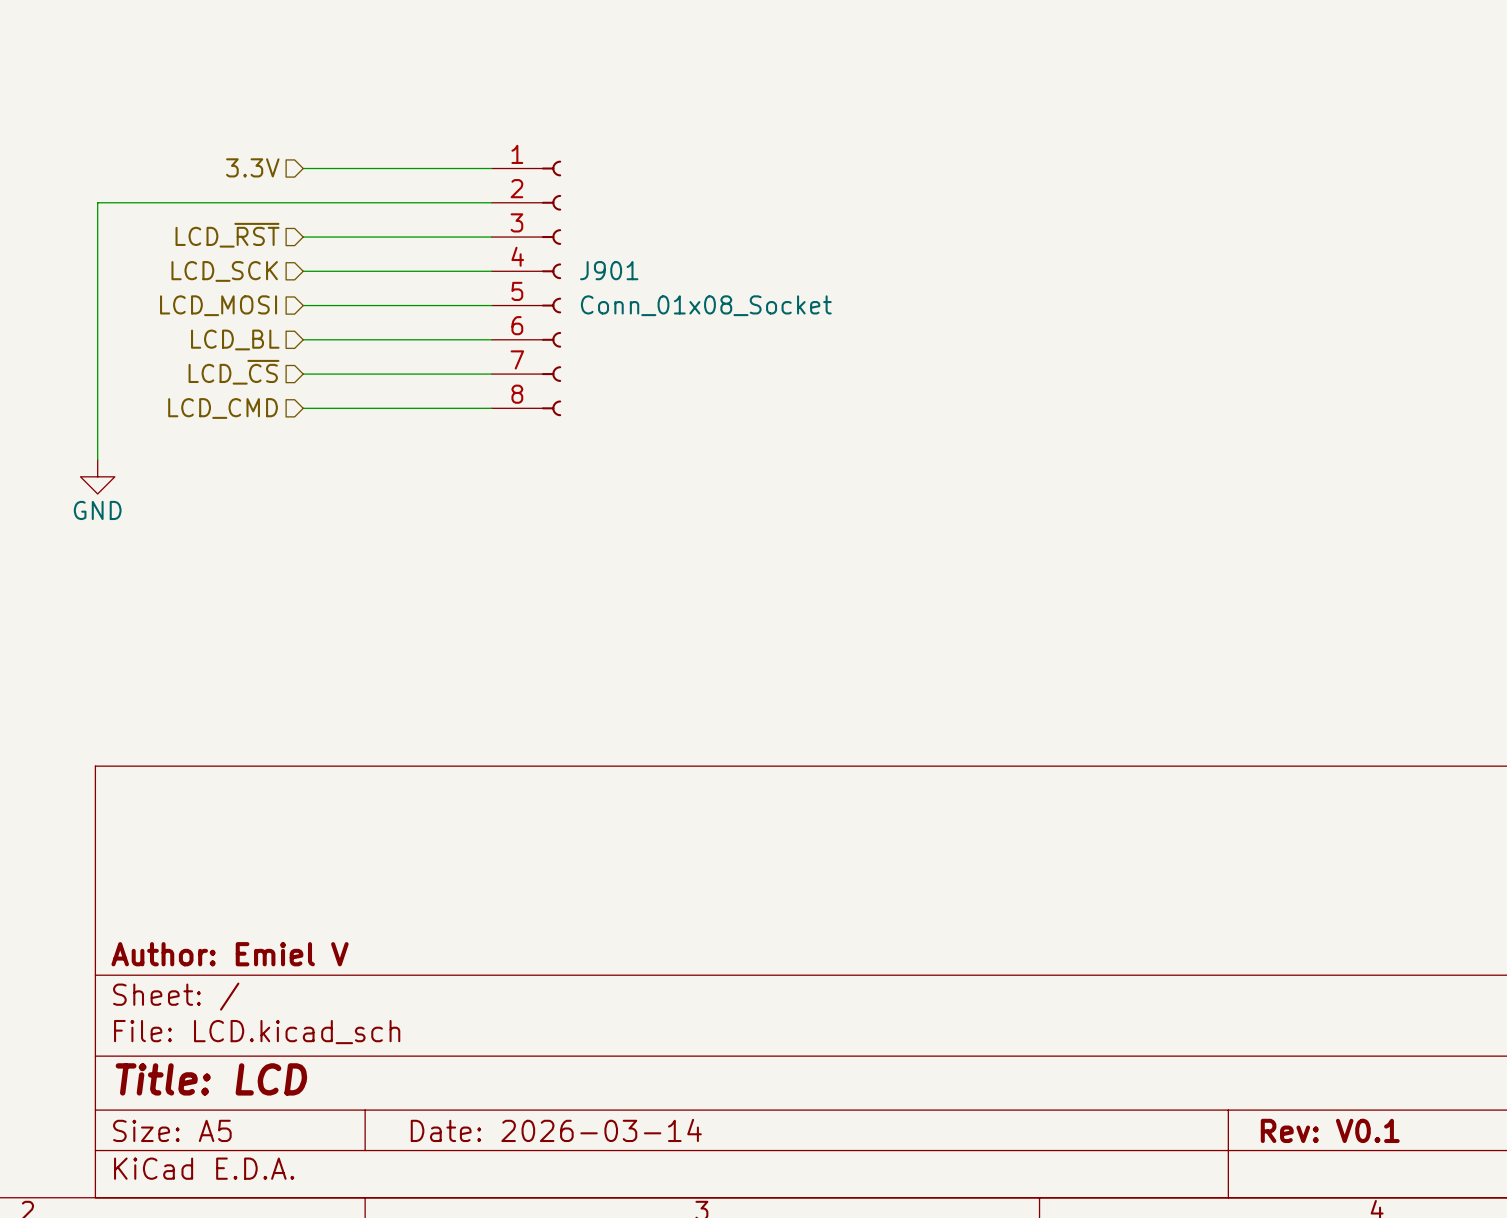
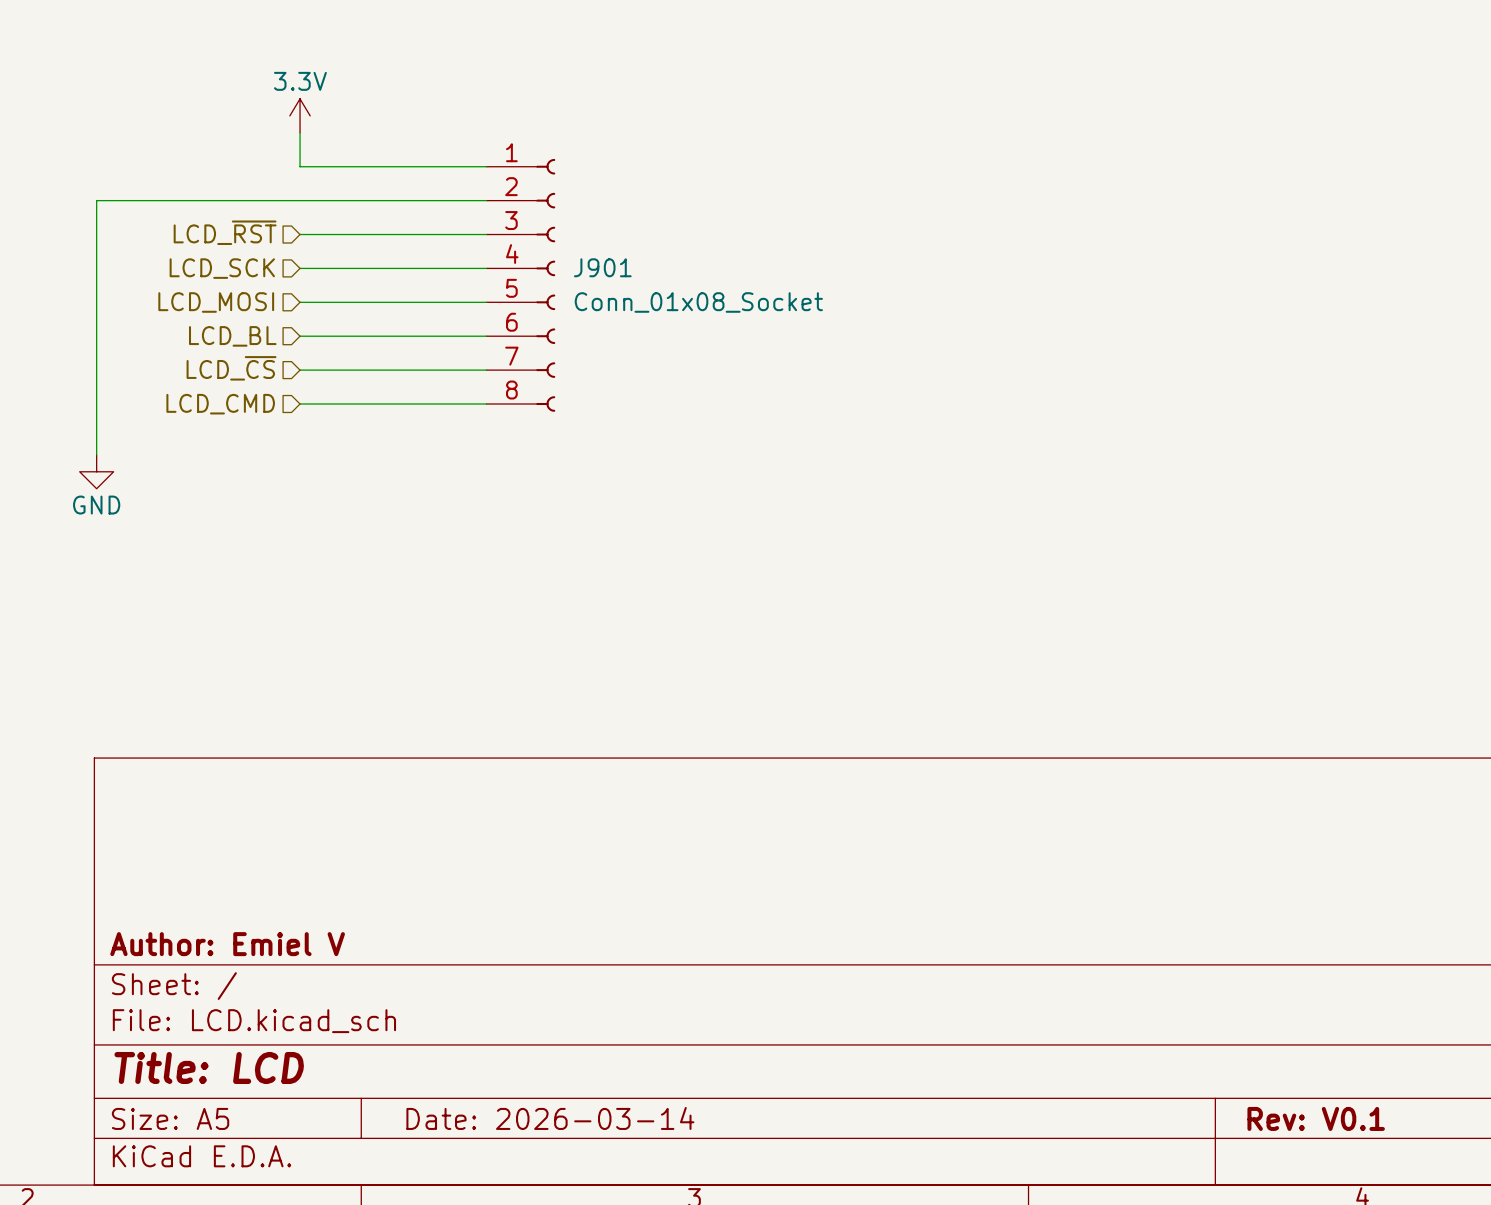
power symbol: none -> 3.3V (300, 115)
wire: none -> (300, 132) (300, 166)
hierarchical label: 3.3V (252, 167) -> none

